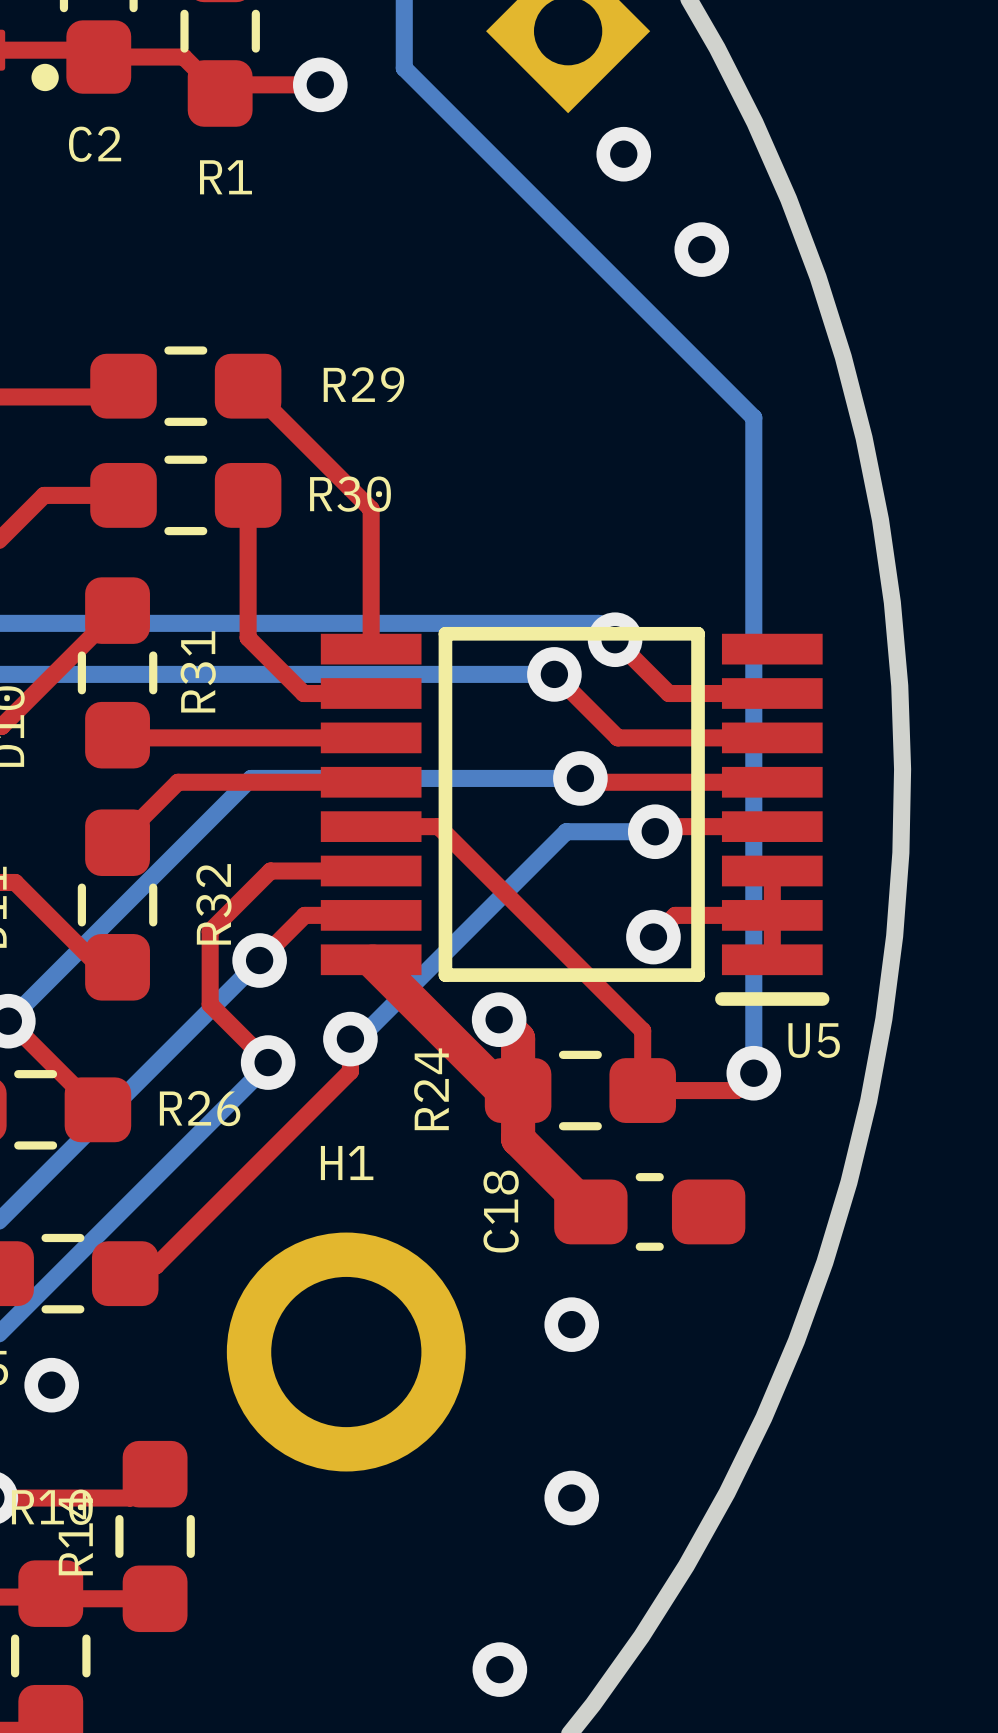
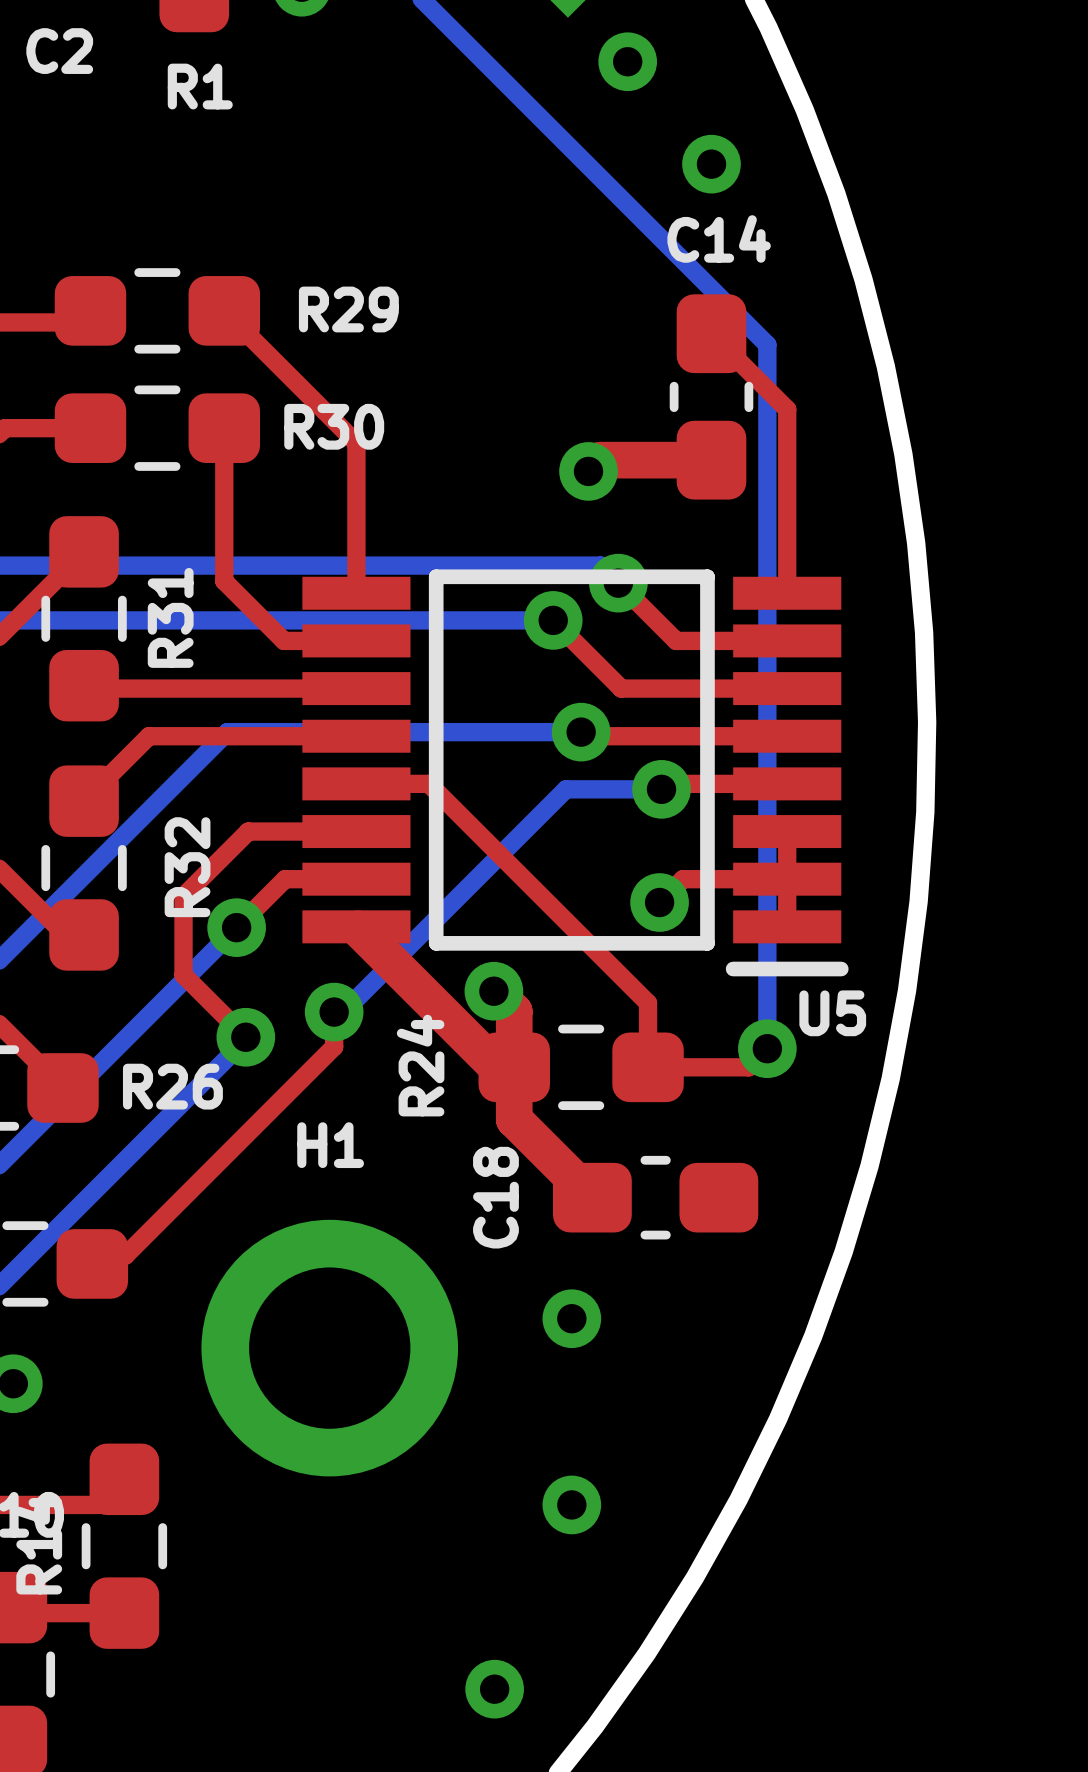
top track: none -> (711, 333) (787, 409) (787, 593)
C14: none -> (711, 396)
top track: none -> (599, 460) (711, 460)
via: none -> (588, 471)

